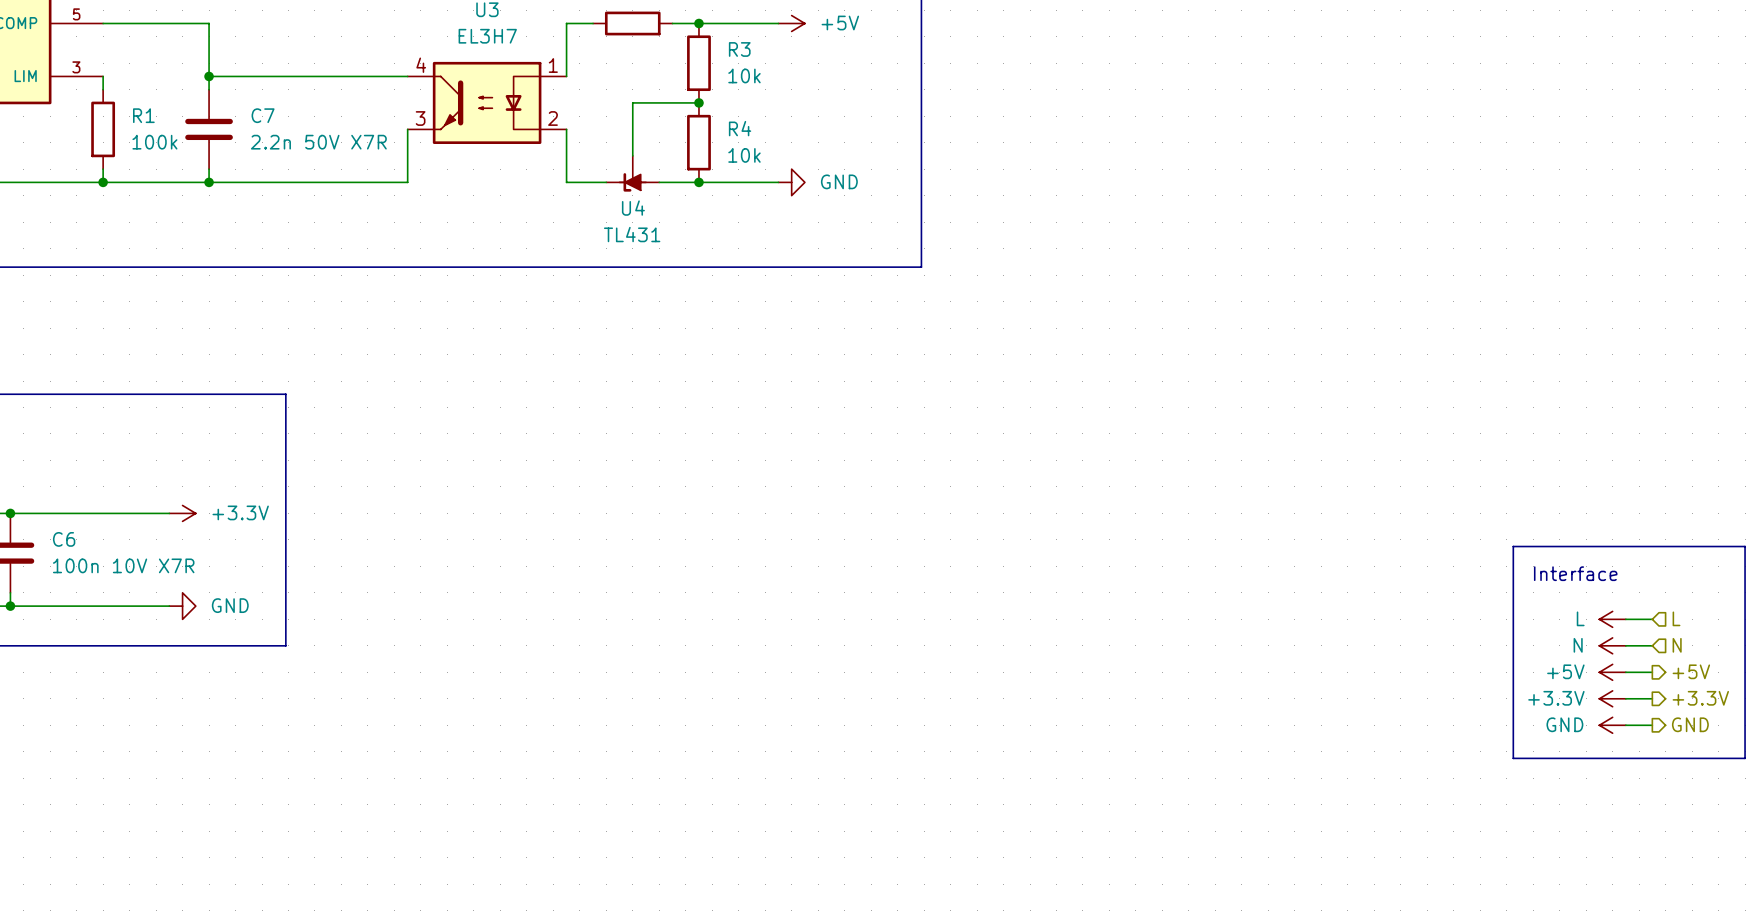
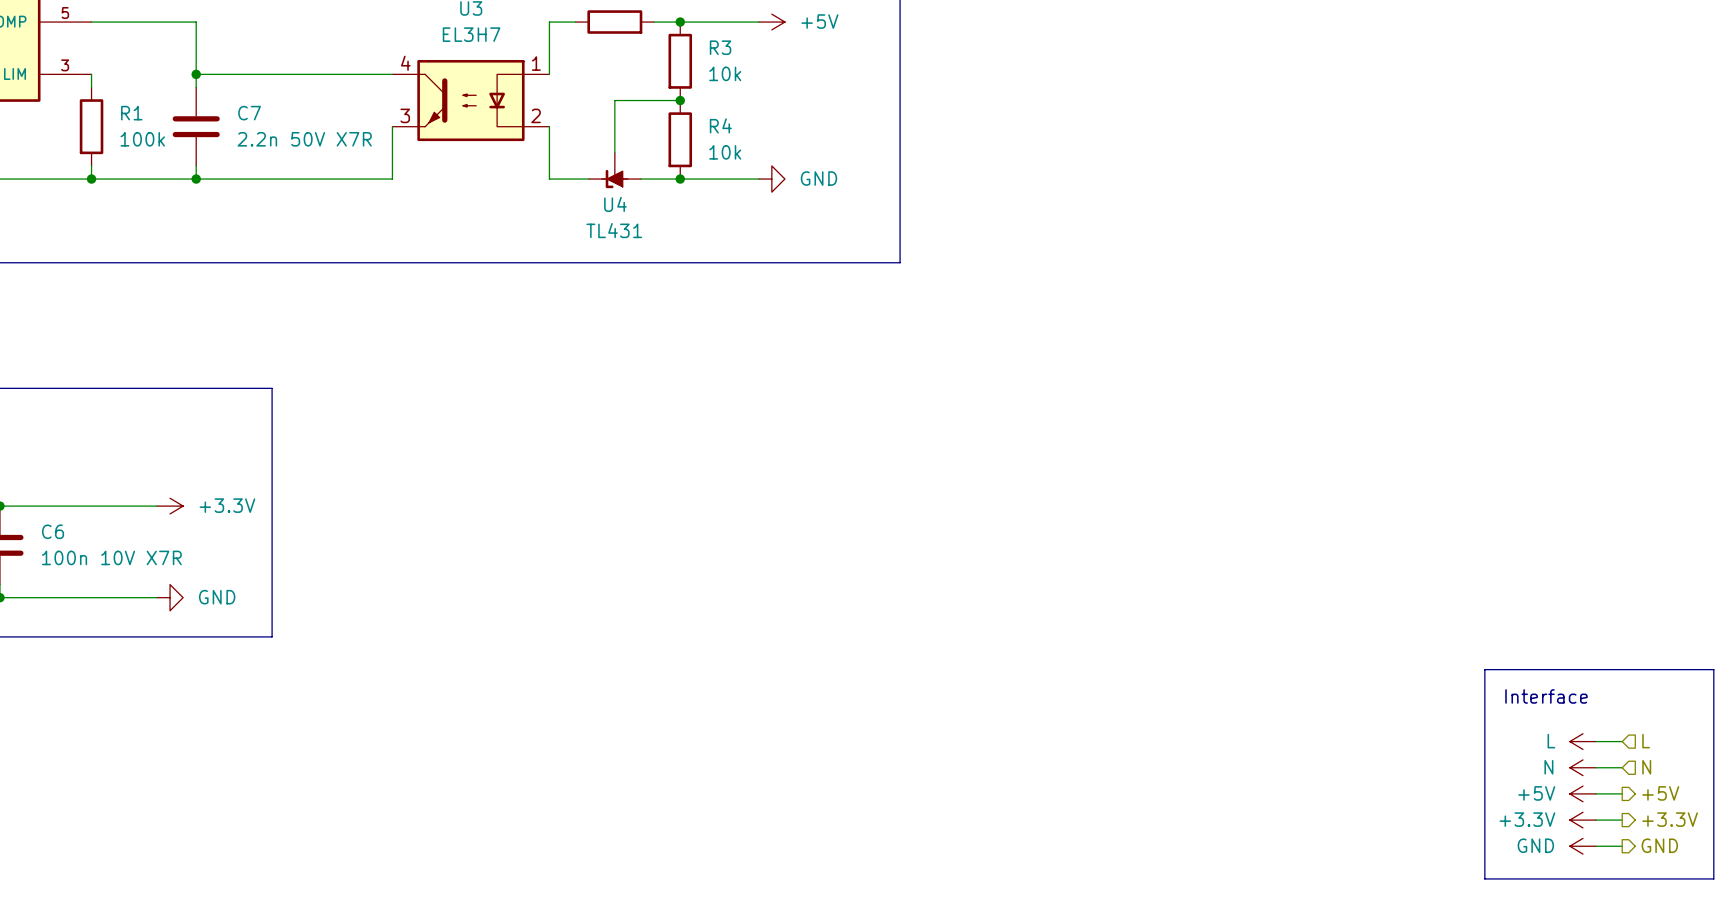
text position: Interface (1575, 573) -> Interface (1546, 696)
hierarchical label position: L (1676, 618) -> L (1646, 741)
power symbol position: L (1612, 619) -> L (1582, 741)
wire: (1625, 619) (1652, 619) -> (1596, 741) (1622, 741)
power symbol position: N (1612, 645) -> N (1582, 767)
wire: (1625, 645) (1652, 645) -> (1596, 767) (1622, 767)
hierarchical label position: N (1677, 645) -> N (1646, 767)
hierarchical label position: +5V (1691, 671) -> +5V (1660, 793)
power symbol position: +5V (1612, 672) -> +5V (1582, 793)
wire: (1625, 672) (1652, 672) -> (1596, 793) (1622, 793)
line: (1513, 678) (1513, 546) (1745, 546) (1745, 678) -> (1484, 669) (1713, 669)
power symbol position: +3.3V (1612, 698) -> +3.3V (1582, 820)
wire: (1625, 698) (1652, 698) -> (1596, 820) (1622, 820)
hierarchical label position: +3.3V (1700, 698) -> +3.3V (1670, 819)
hierarchical label position: GND (1690, 724) -> GND (1659, 845)
power symbol position: GND (1612, 725) -> GND (1582, 846)
wire: (1625, 725) (1652, 725) -> (1596, 846) (1622, 846)
line: (1513, 758) (1745, 758) -> (1484, 748) (1484, 878) (1713, 878) (1713, 748)

